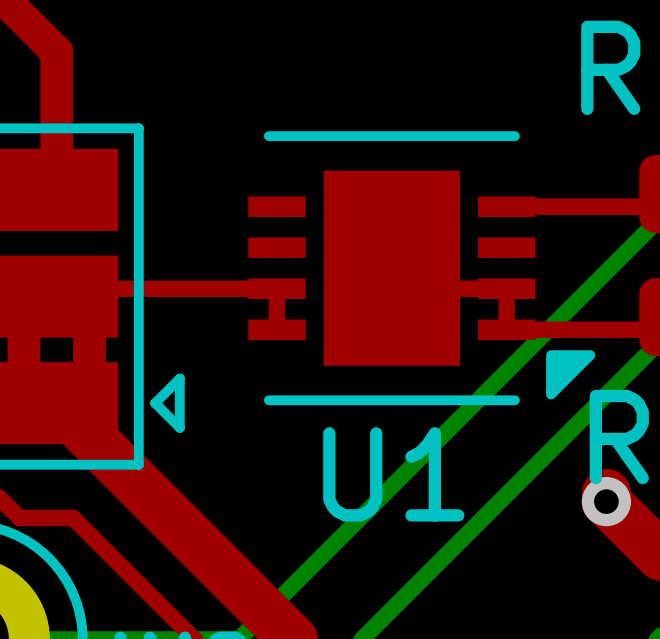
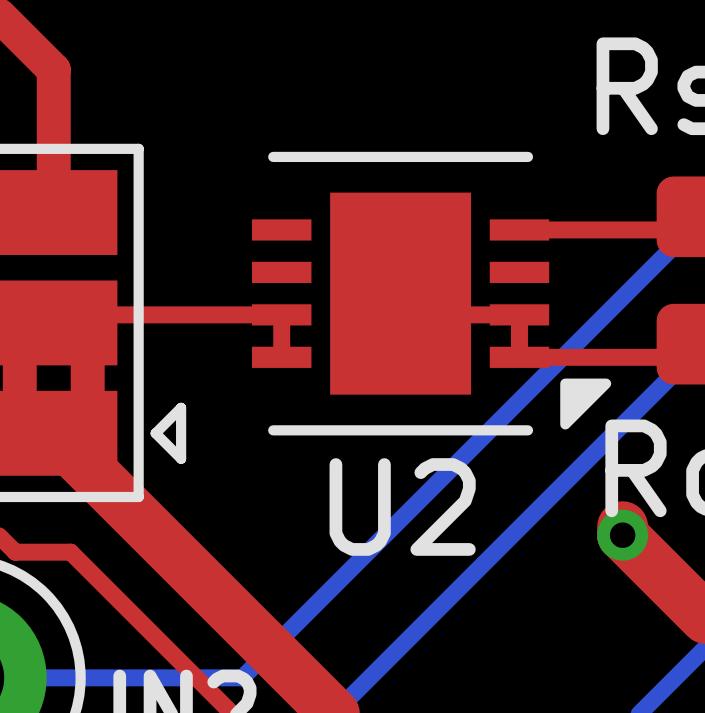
U1 name: U1 (393, 474) -> U2 (402, 506)

